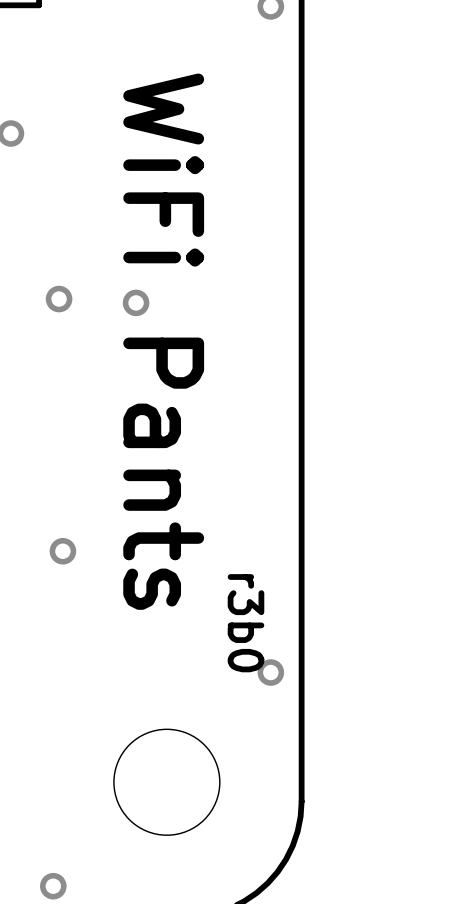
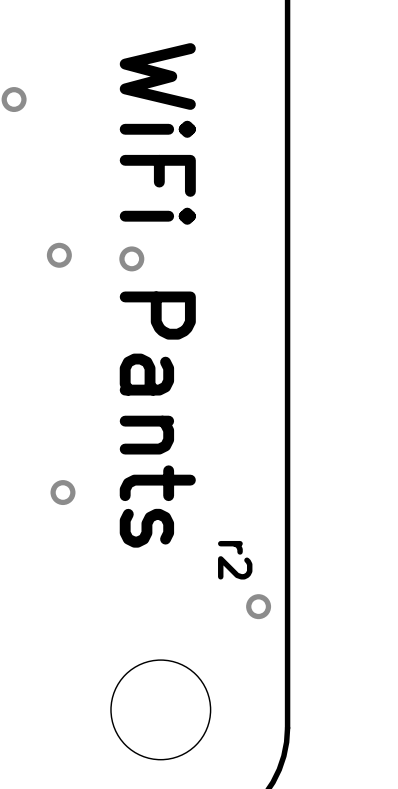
text: r3b0 (245, 623) -> r2 (235, 560)

